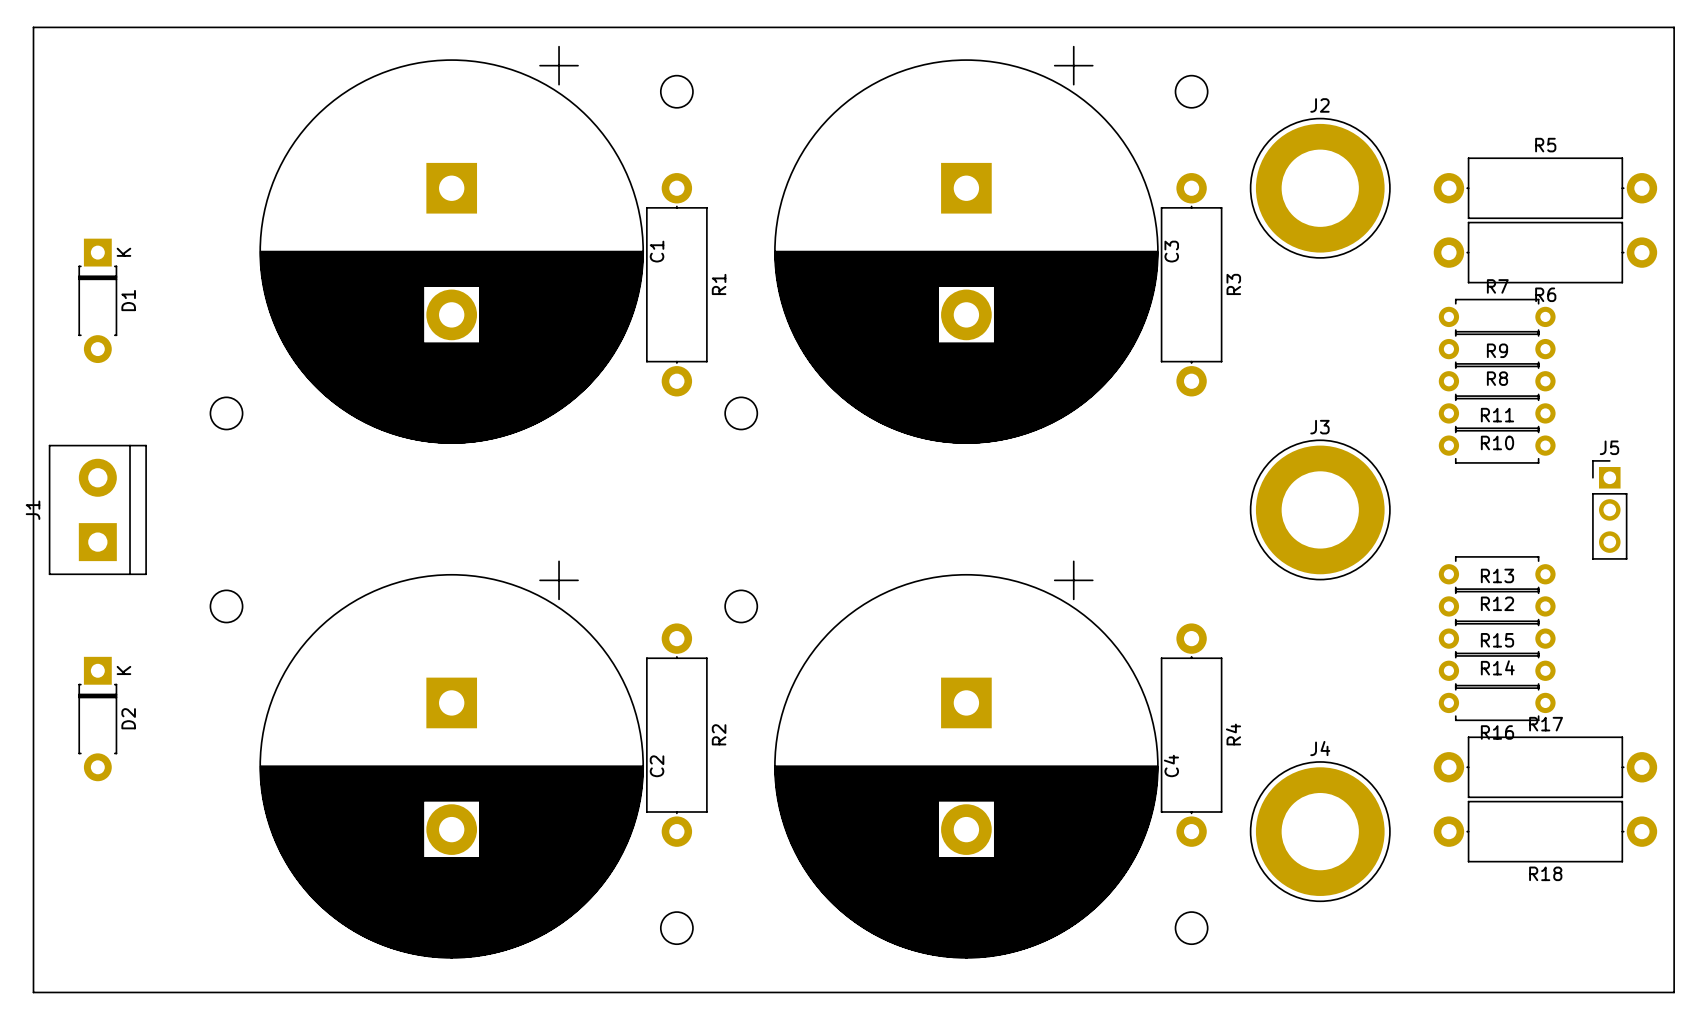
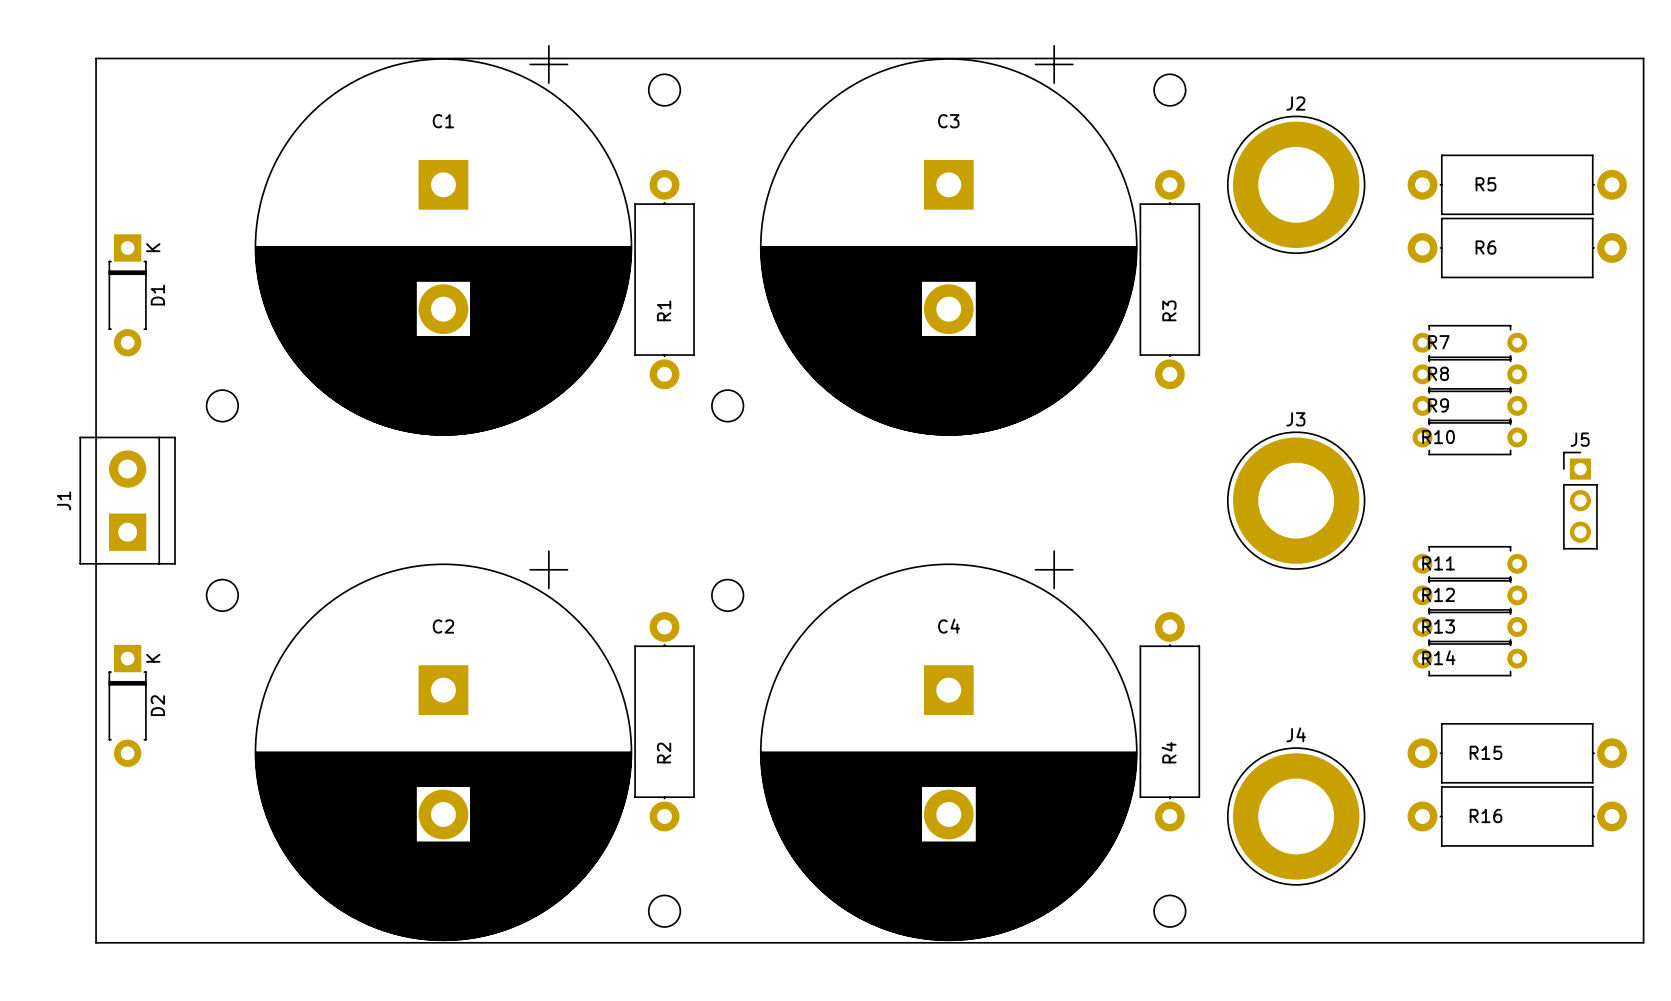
board edge: (1674, 59) (1674, 27) (33, 27) (33, 992) (1674, 992) (1674, 960) -> (1643, 58) (96, 58) (96, 942) (1643, 942)
R5 name position: R5 (1545, 145) -> R5 (1485, 184)
C1 name rotation: 0° (657, 251) -> 90° clockwise (443, 121)
C1 name position: C1 (657, 251) -> C1 (443, 121)
C3 name rotation: 0° (1171, 251) -> 90° clockwise (948, 121)
C3 name position: C3 (1171, 251) -> C3 (948, 121)
R1 name position: R1 (719, 284) -> R1 (664, 310)
R3 name position: R3 (1233, 284) -> R3 (1169, 310)
R6 name position: R6 (1545, 294) -> R6 (1485, 247)
D1 position: (97, 300) -> (127, 295)
R7: (1497, 316) -> none
R9 name: R9 (1497, 350) -> R8 (1438, 373)
R8 name: R8 (1497, 378) -> R7 (1438, 342)
R11 name: R11 (1497, 415) -> R10 (1438, 437)
R10 name: R10 (1497, 442) -> R9 (1438, 405)
J1 position: (97, 509) -> (127, 500)
R13 name: R13 (1497, 575) -> R12 (1438, 594)
R12 name: R12 (1497, 603) -> R11 (1438, 563)
R15 name: R15 (1497, 640) -> R14 (1438, 657)
R14 name: R14 (1497, 667) -> R13 (1438, 626)
R16: (1497, 702) -> none
D2 position: (97, 719) -> (127, 705)
R17 name: R17 (1546, 724) -> R15 (1485, 752)
R2 name position: R2 (719, 734) -> R2 (664, 753)
R4 name position: R4 (1233, 734) -> R4 (1169, 752)
C4 name rotation: 0° (1171, 765) -> 90° clockwise (949, 626)
C4 name position: C4 (1171, 765) -> C4 (949, 626)
C2 name rotation: 0° (657, 766) -> 90° clockwise (443, 626)
C2 name position: C2 (657, 766) -> C2 (443, 626)
R18 name: R18 (1545, 873) -> R16 (1485, 816)

